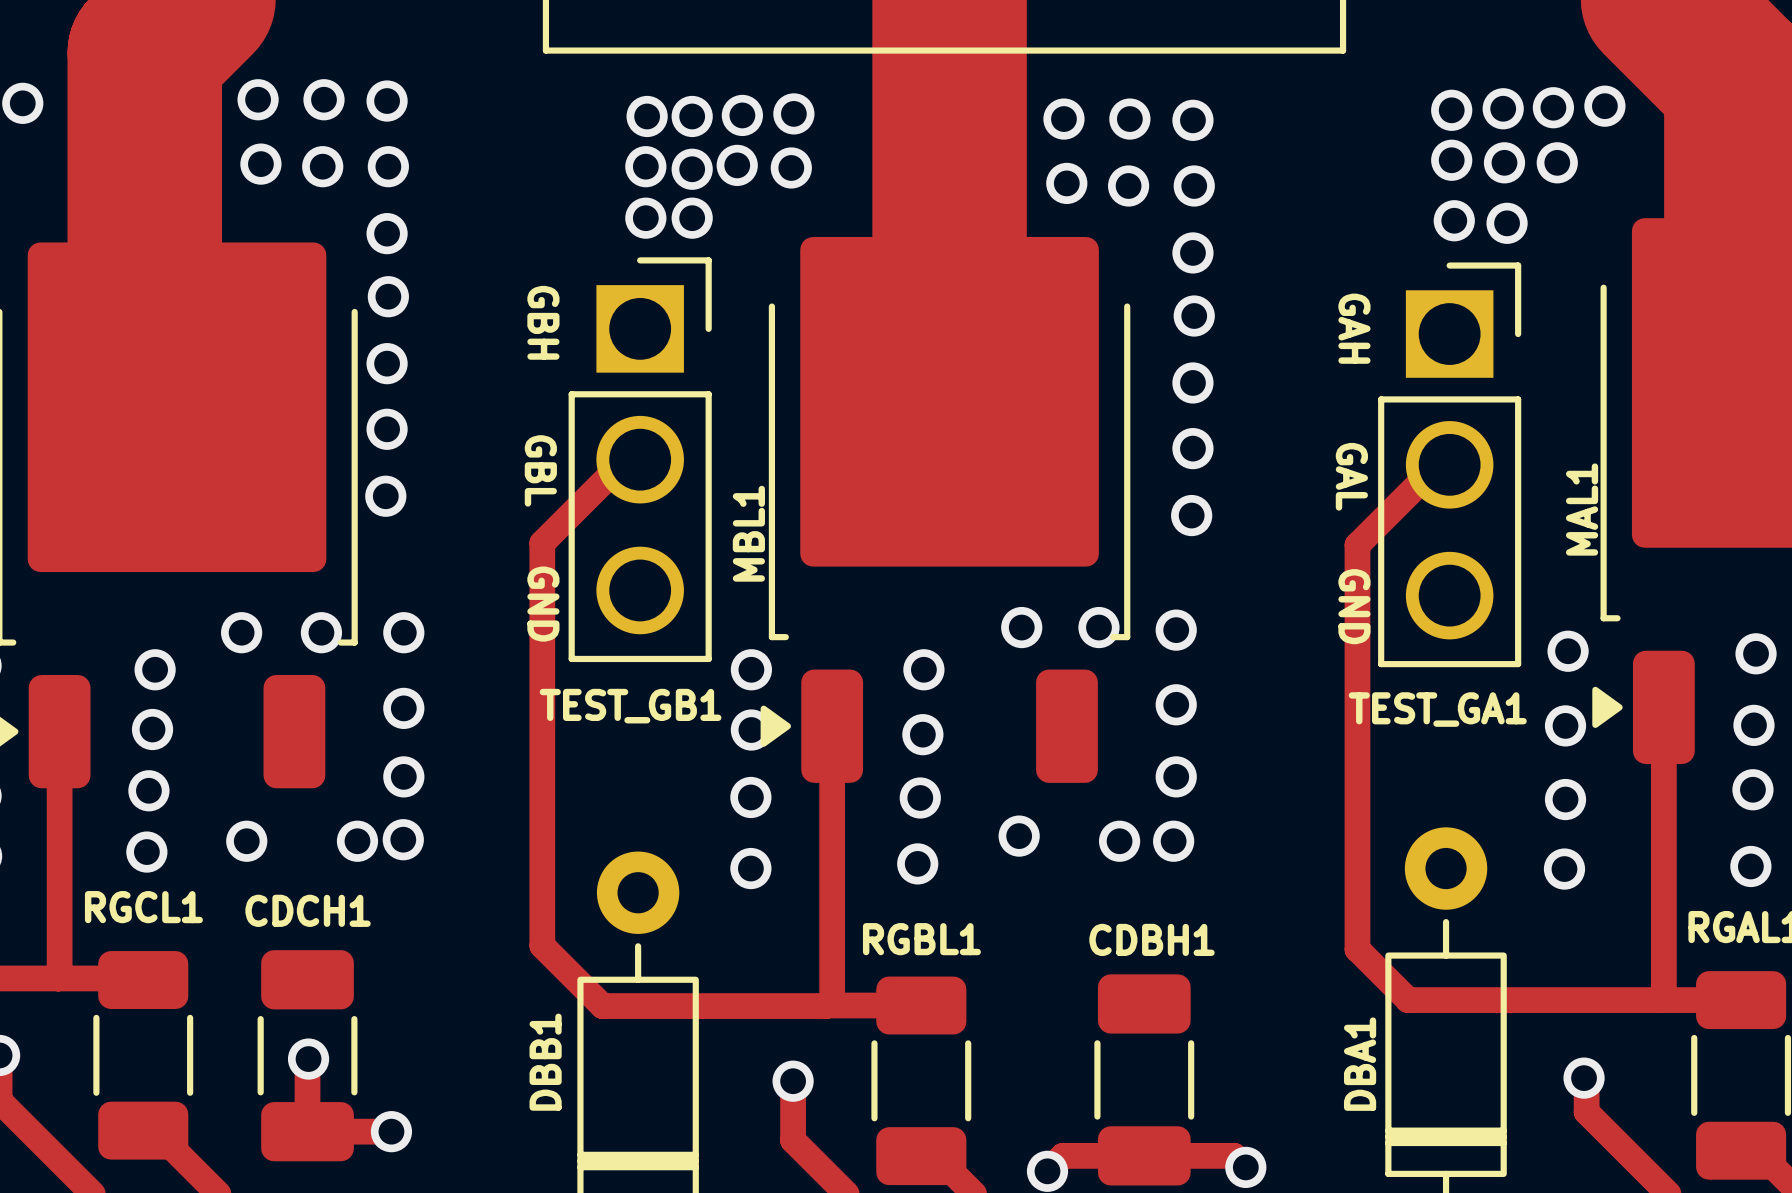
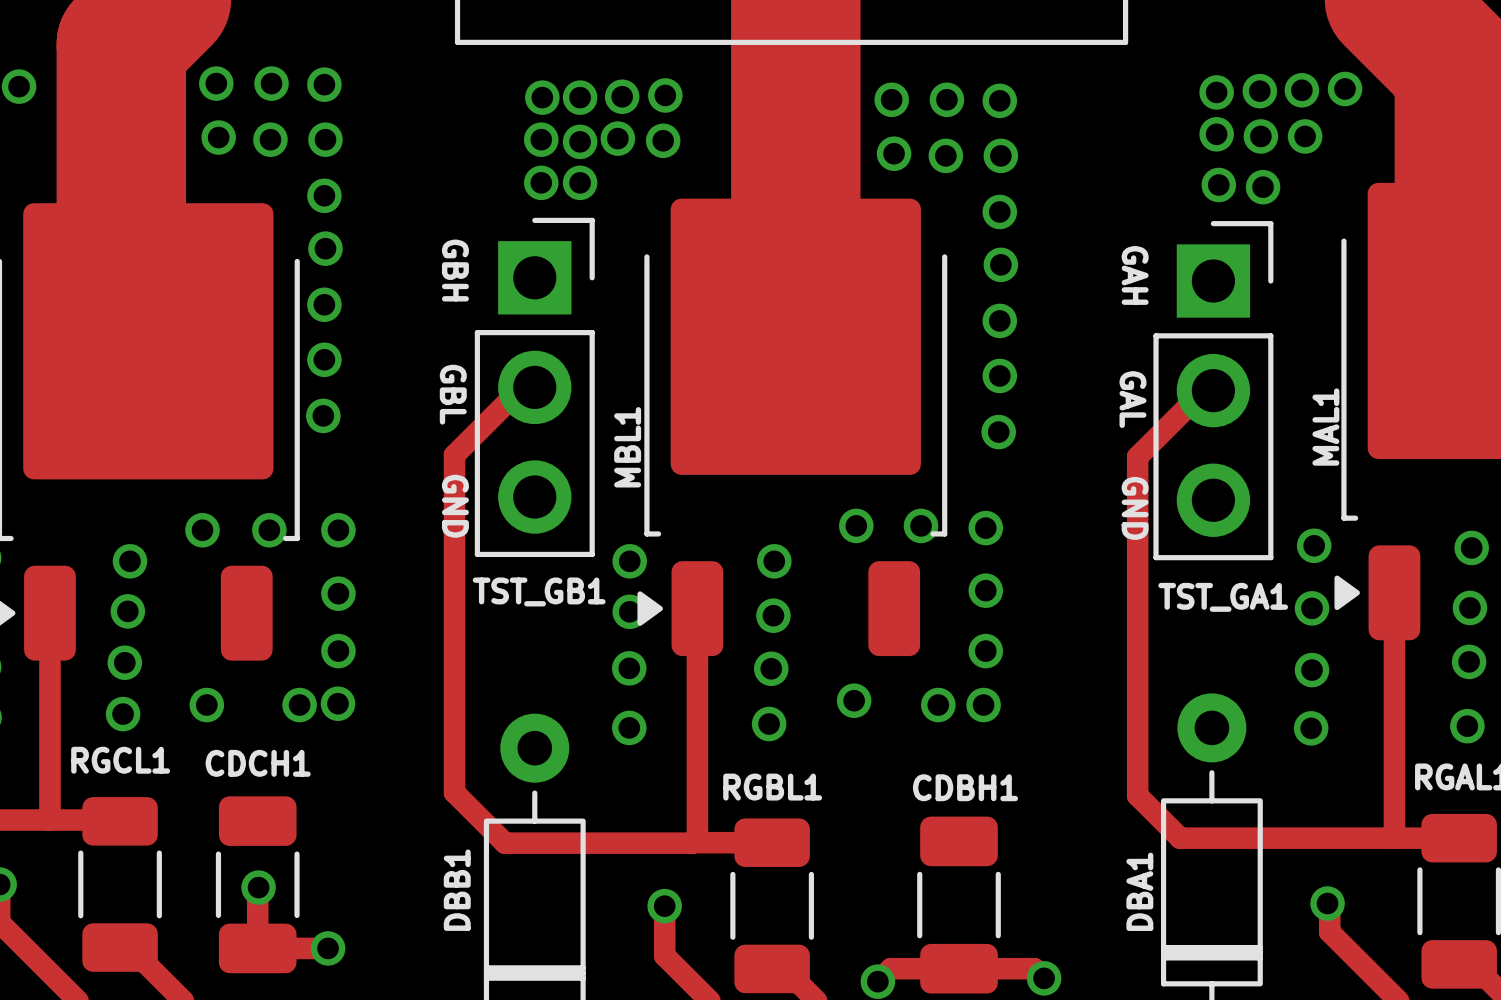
TEST_GB1: (640, 459) -> none
TST_GB1: none -> (534, 387)
TEST_GA1: (1449, 464) -> none
TST_GA1: none -> (1213, 390)

